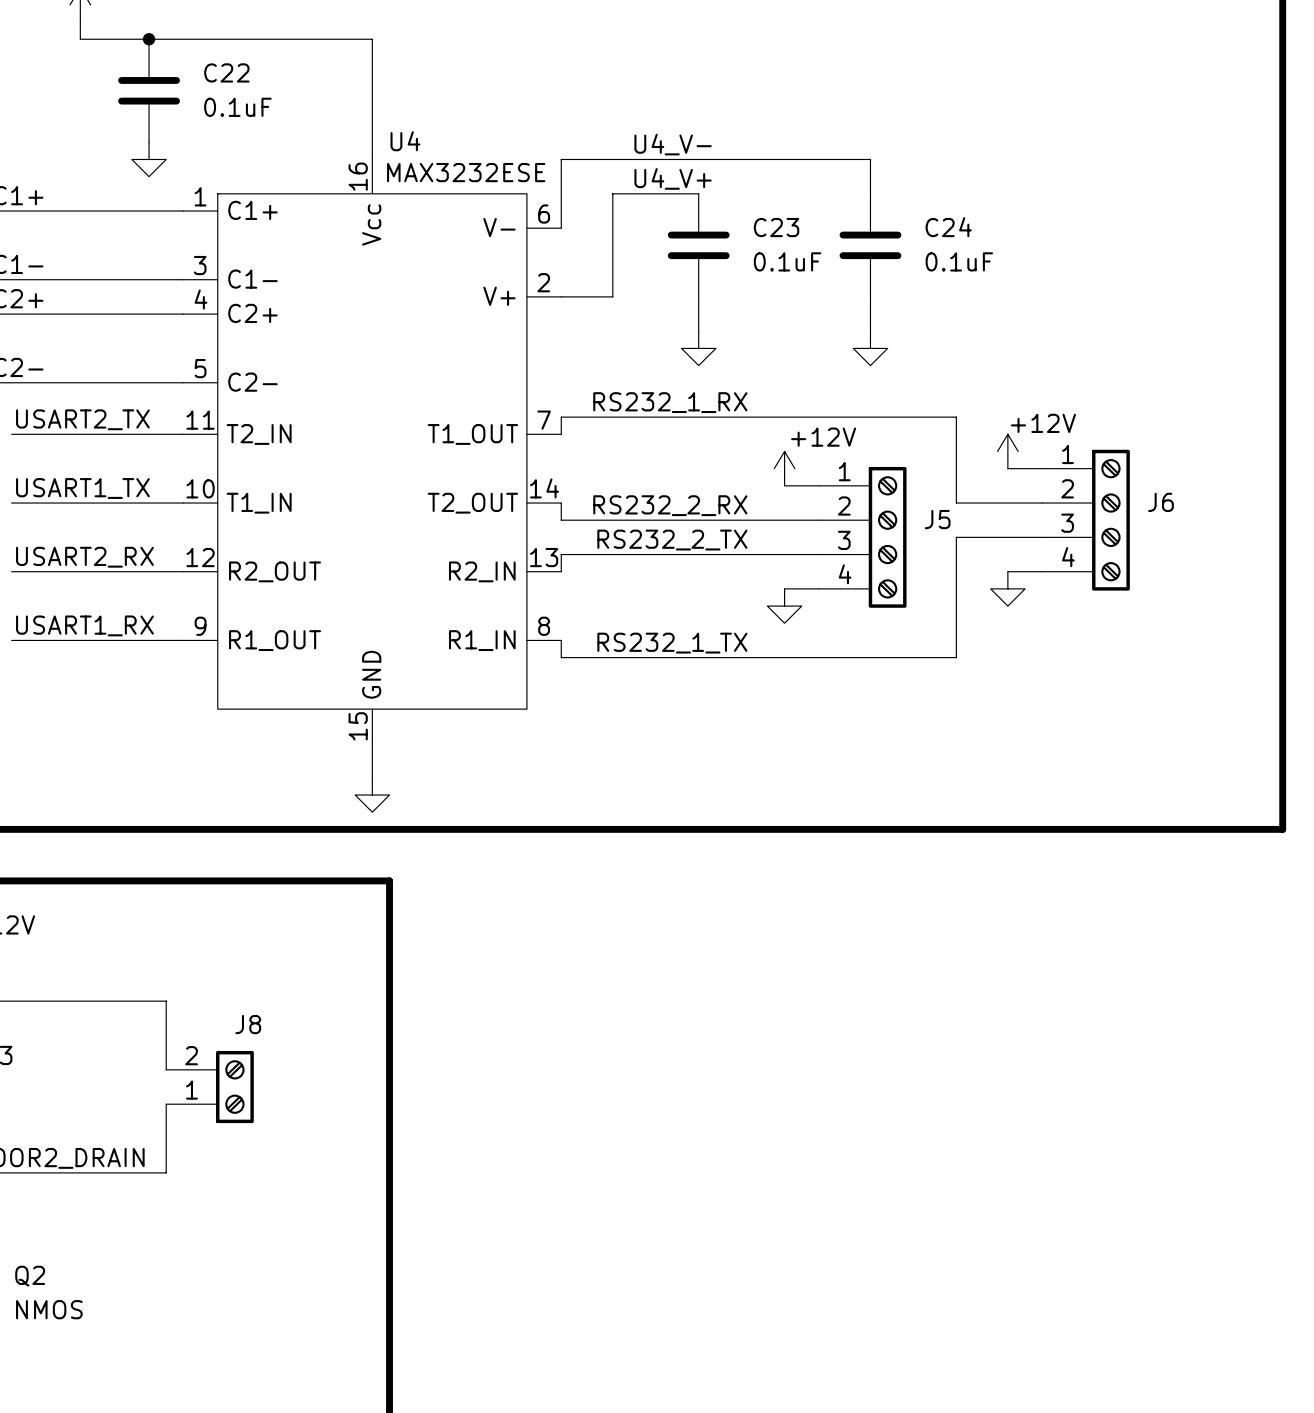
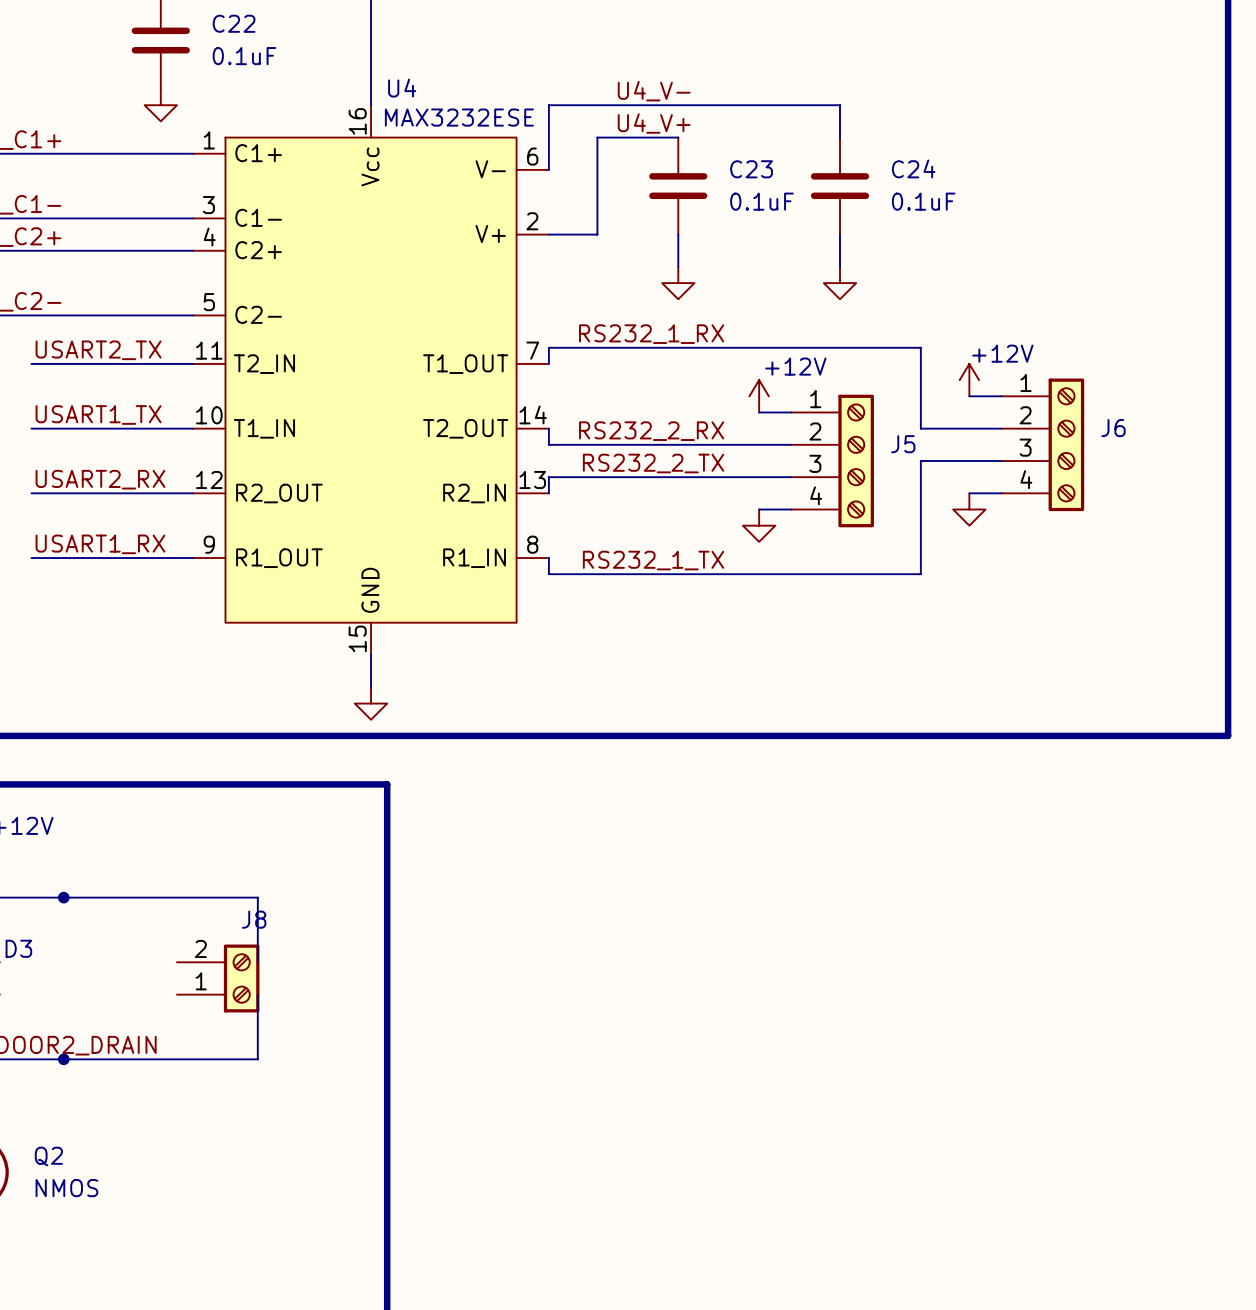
junction: none -> (63, 897)
wire: (166, 1001) (166, 1069) -> (176, 897) (257, 897) (257, 962)
wire: (166, 1104) (166, 1172) -> (257, 994) (257, 1059) (176, 1059)
junction: none -> (63, 1059)

